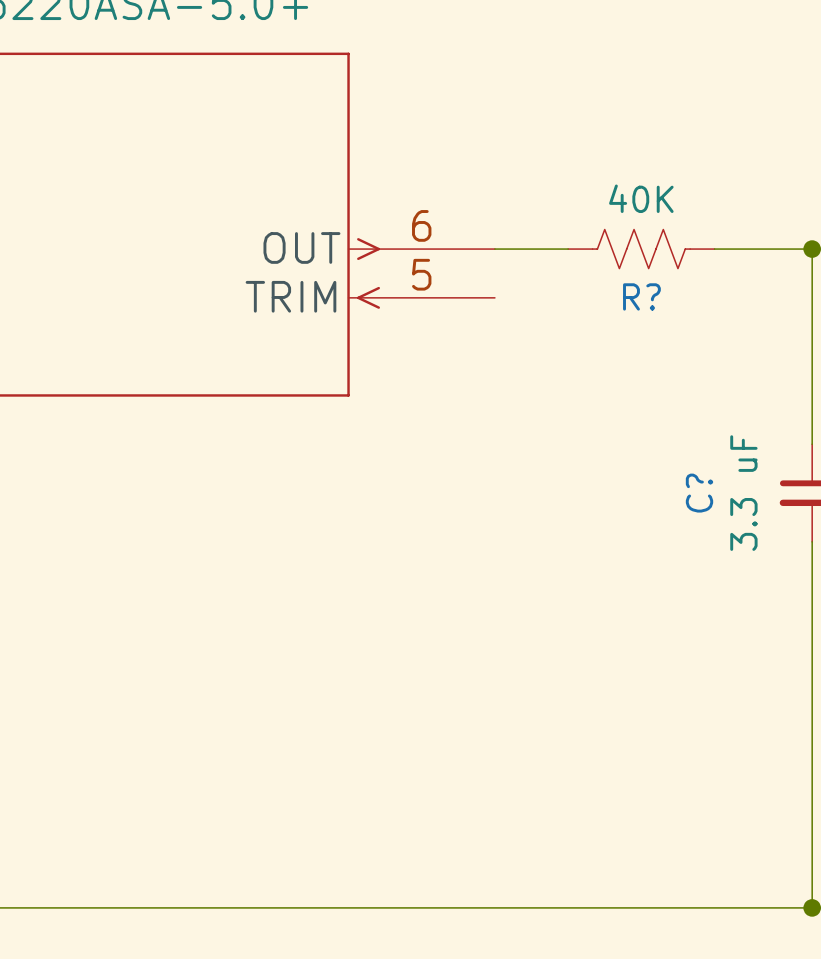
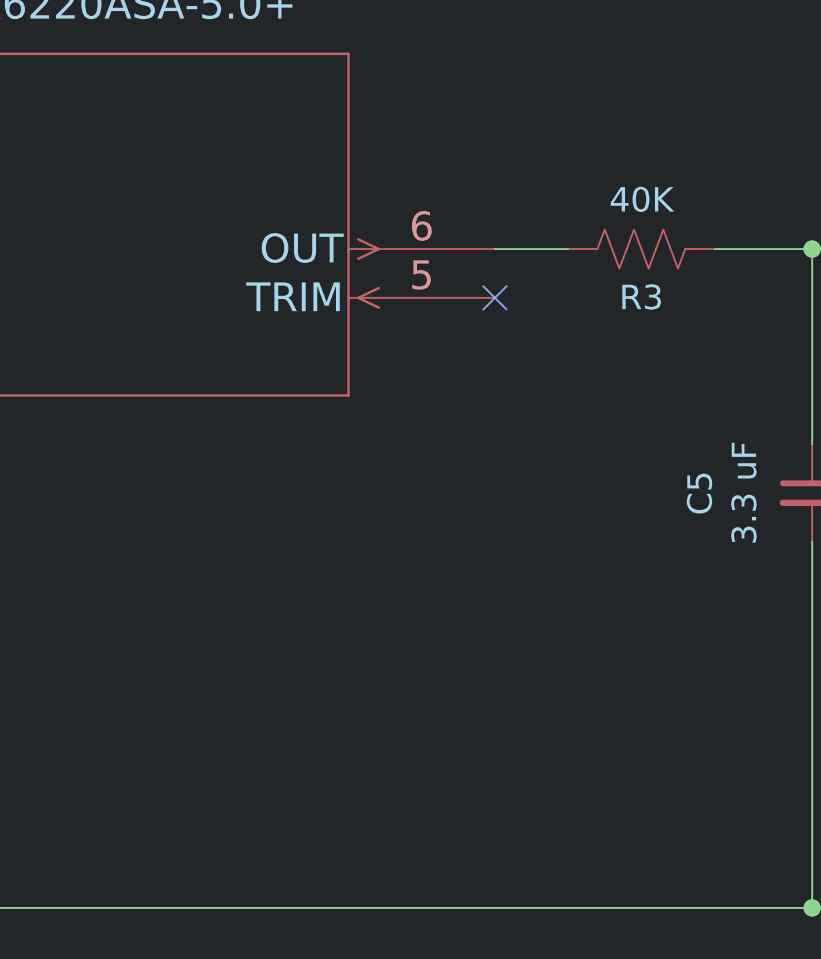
R? name: R? (641, 296) -> R3 (641, 296)
no-connect mark: none -> (494, 297)
C? name: C? (699, 493) -> C5 (699, 493)

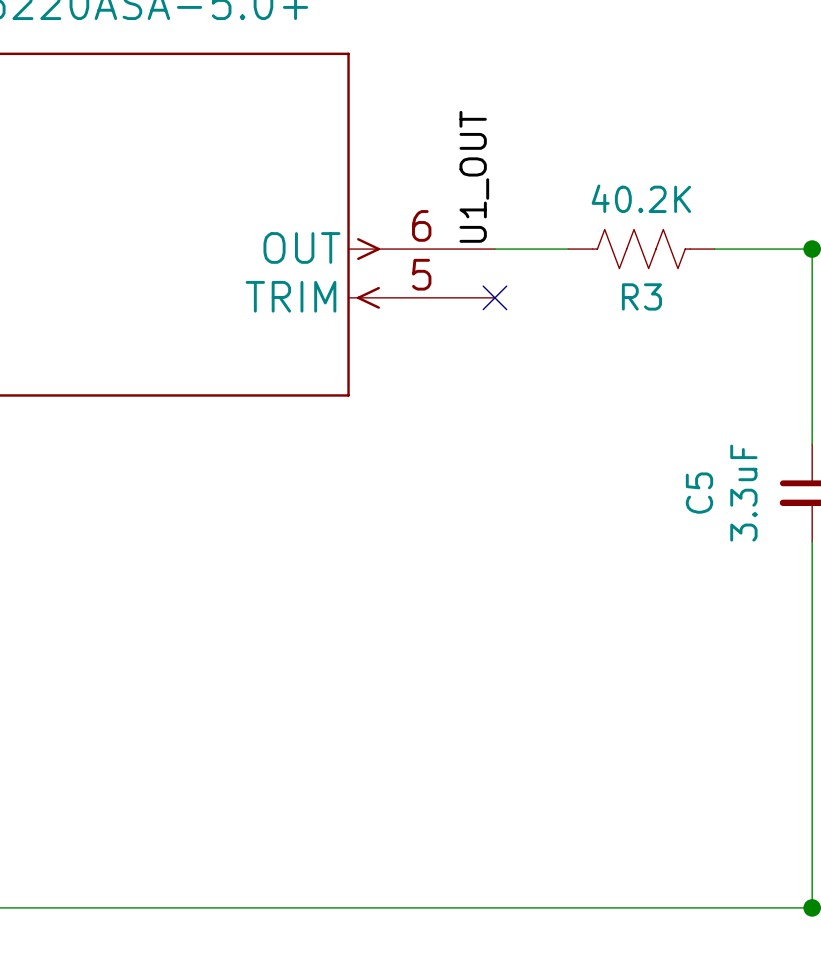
label: none -> U1_OUT (474, 176)
R3 value: 40K (642, 199) -> 40.2K (641, 198)
C5 value: 3.3 uF (743, 492) -> 3.3uF (743, 493)

